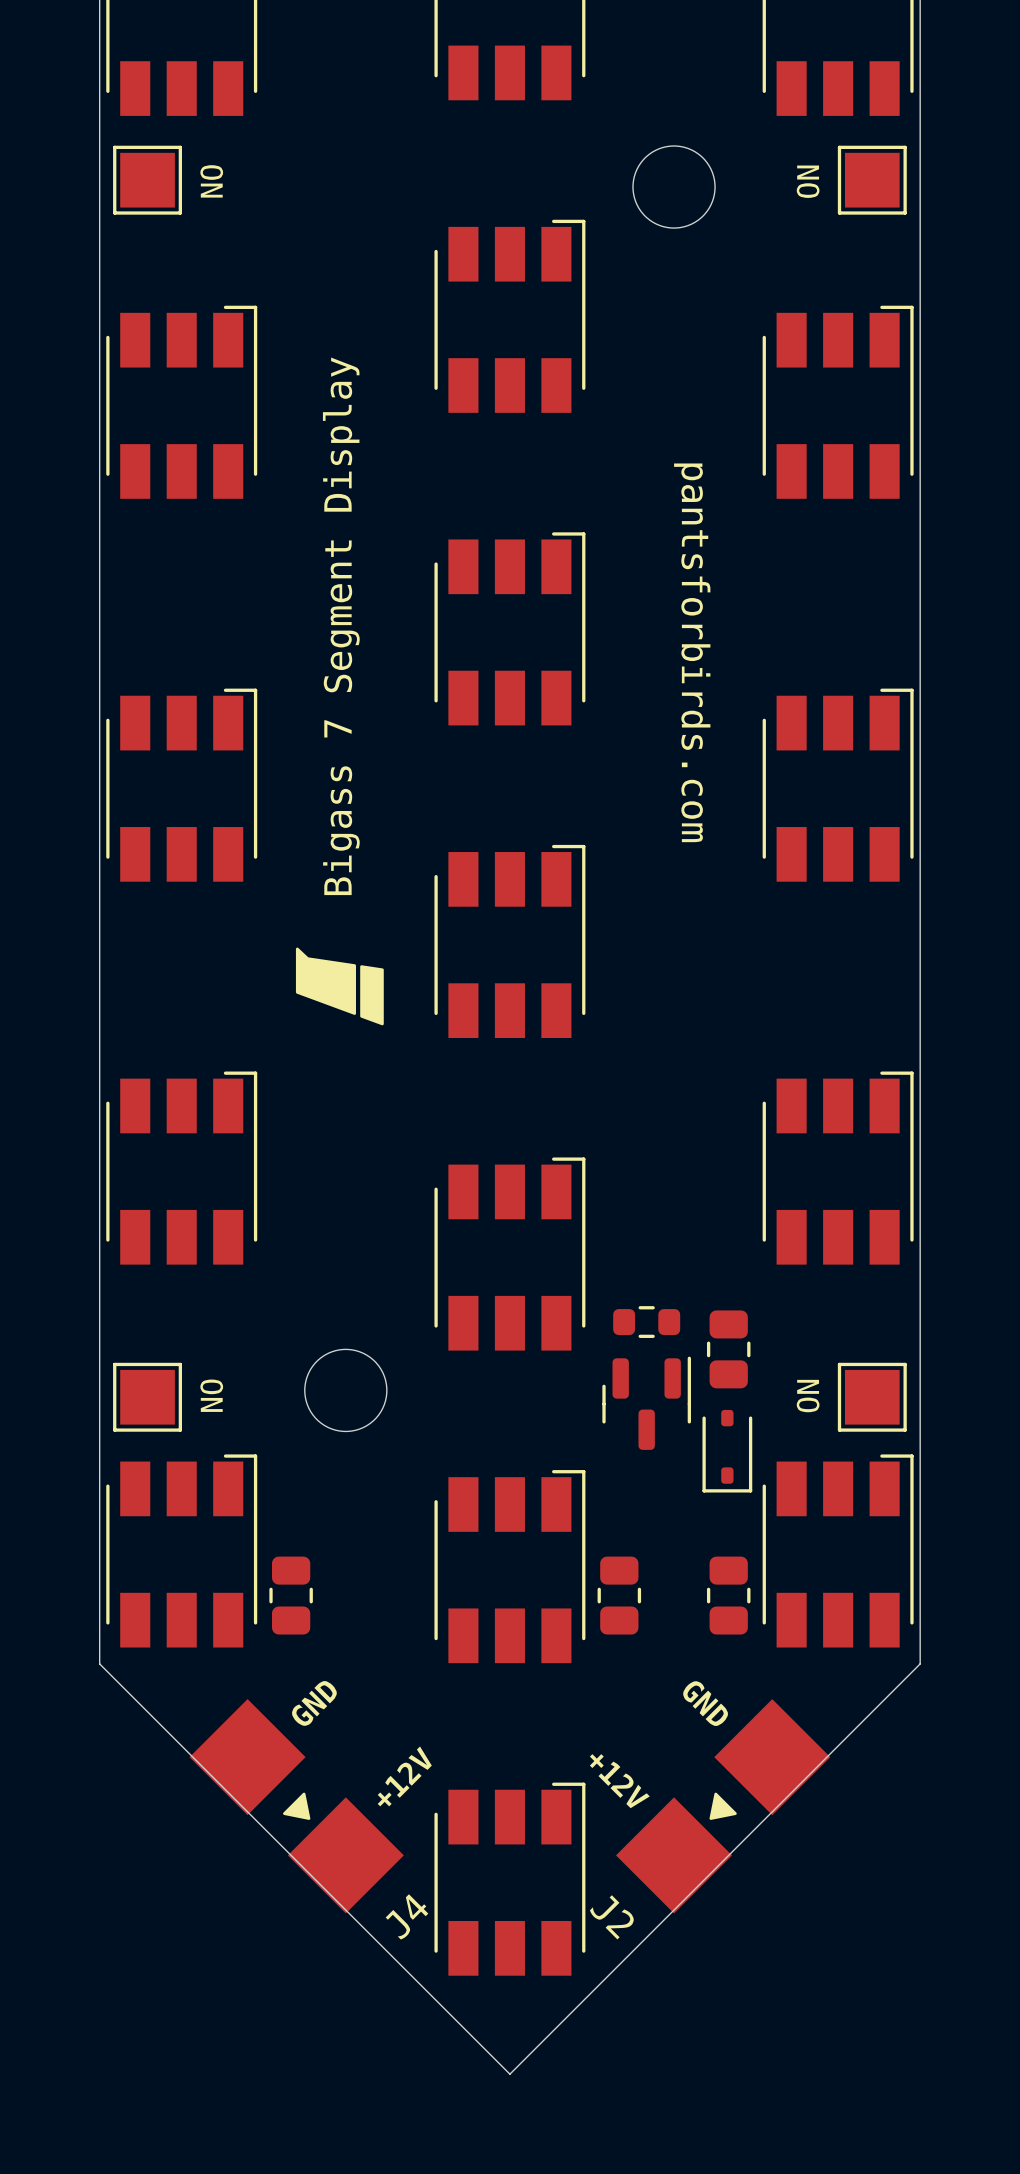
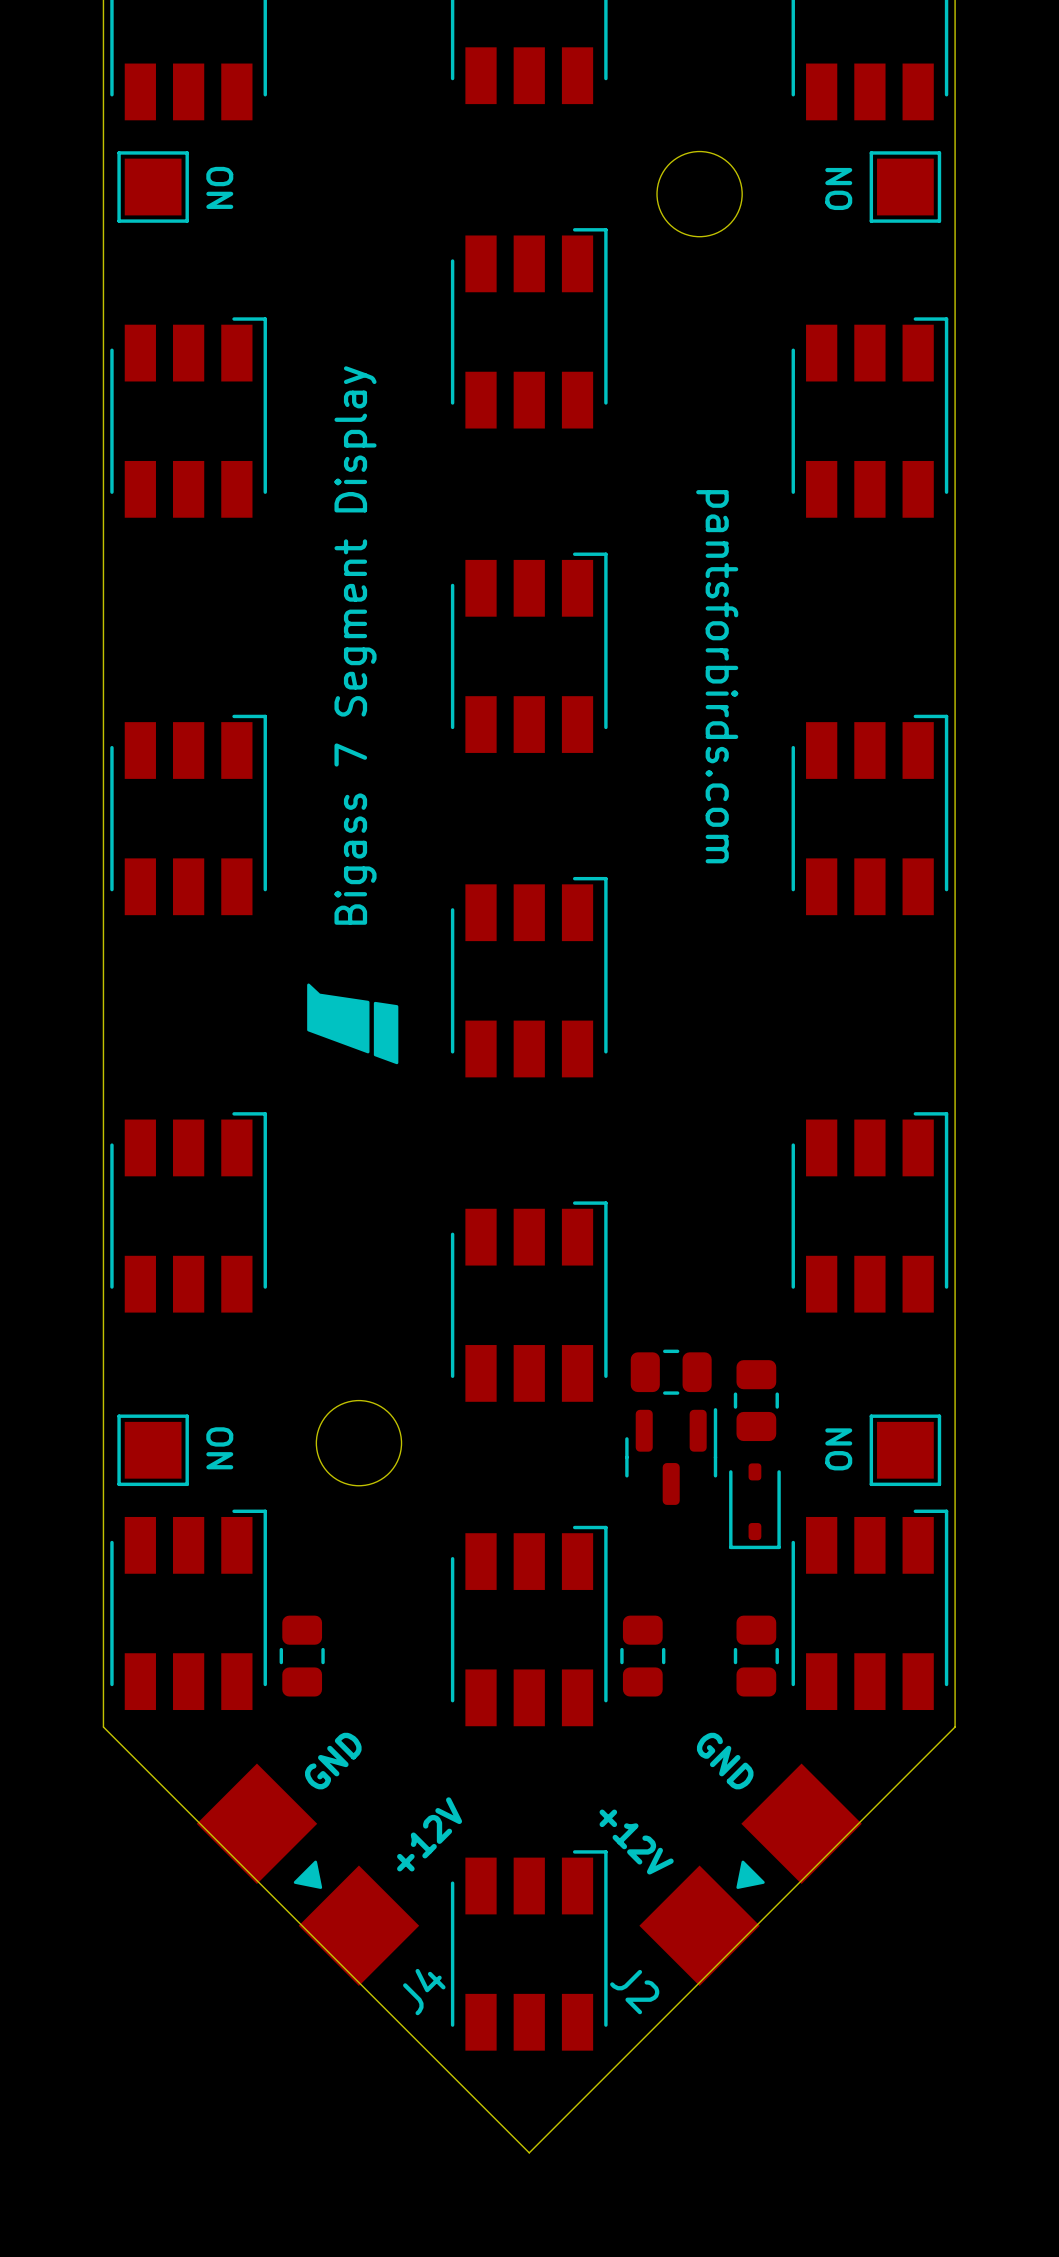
part footprint: [613, 1306, 681, 1338] -> [630, 1349, 712, 1395]

